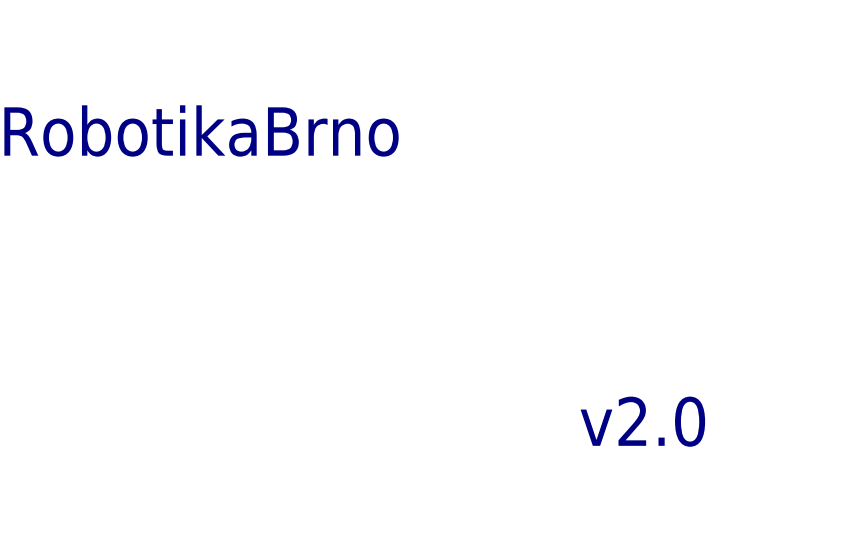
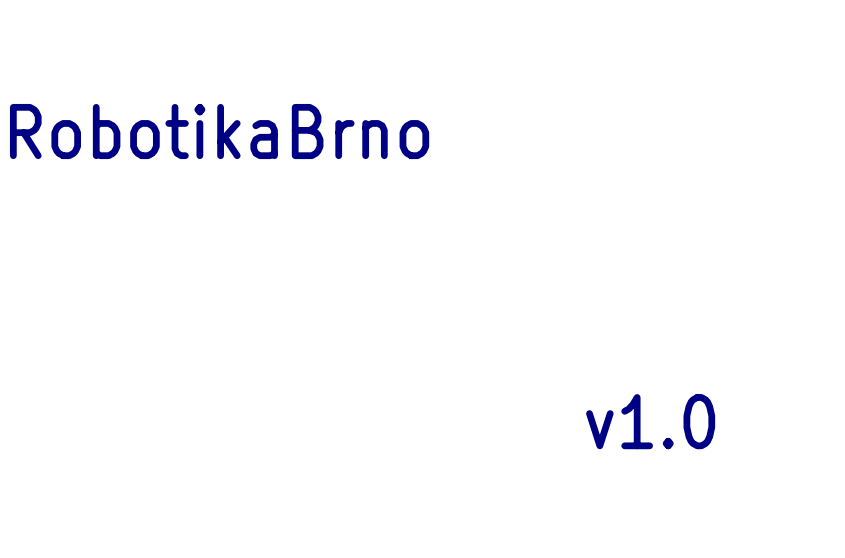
text: v2.0 (642, 421) -> v1.0 (650, 421)

